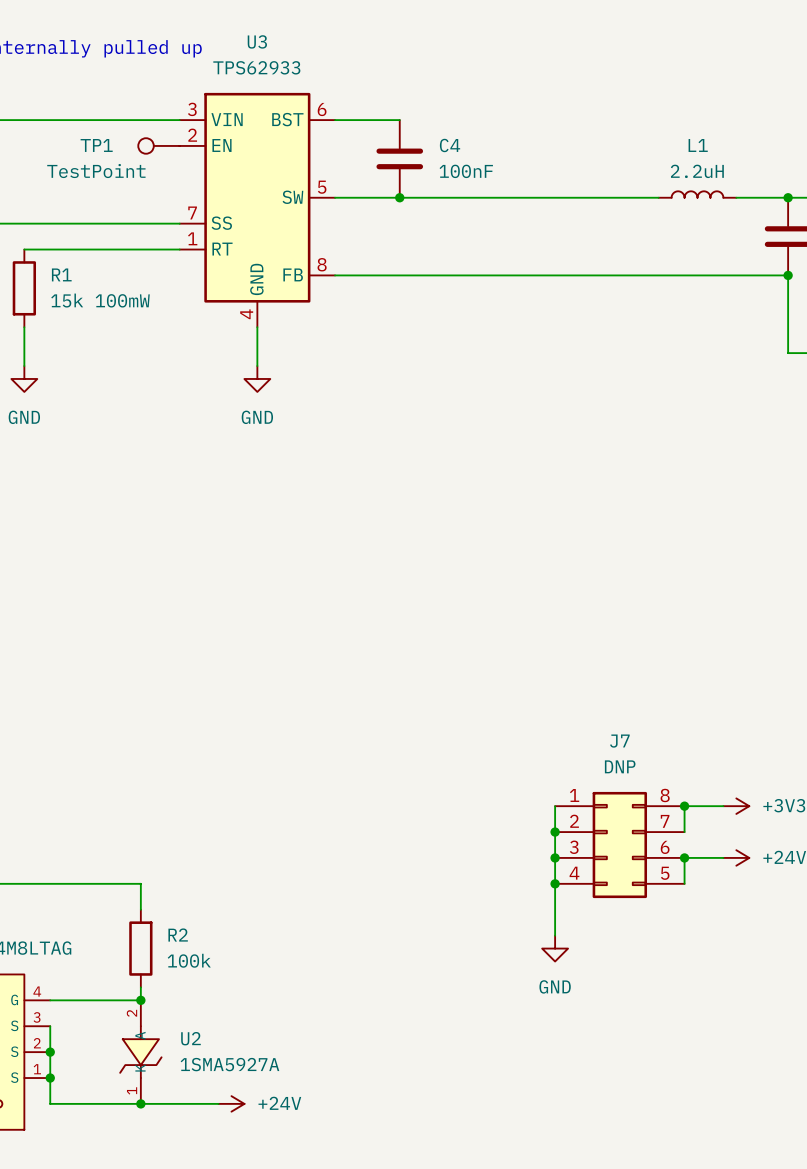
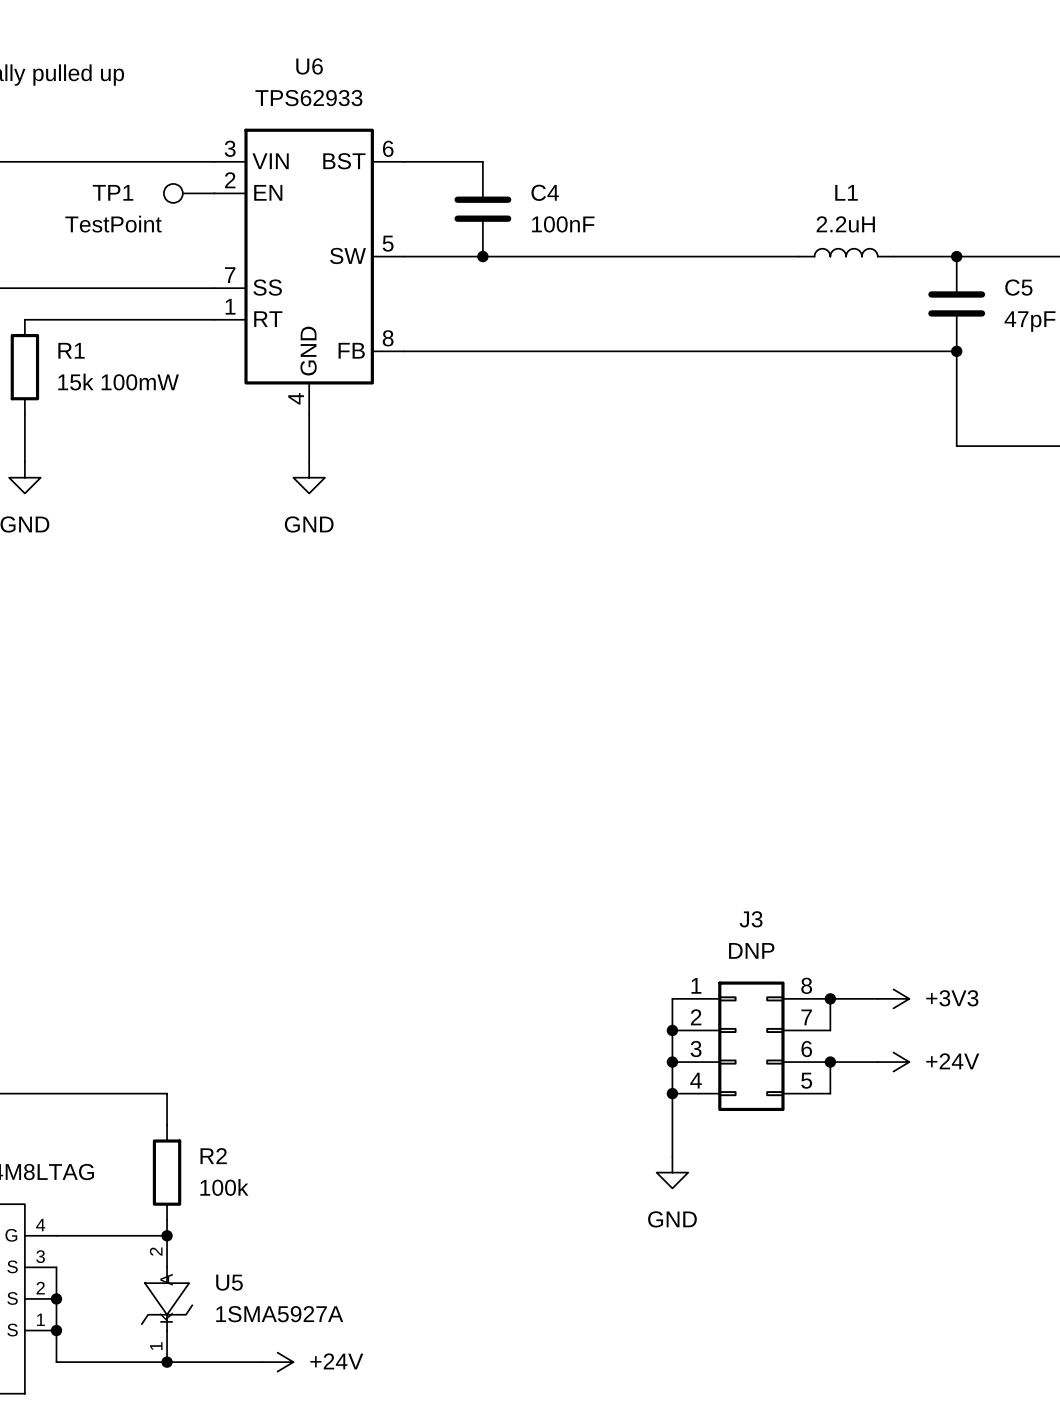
U3 name: U3 (257, 41) -> U6 (309, 66)
J7 name: J7 (619, 741) -> J3 (751, 919)
U2 name: U2 (190, 1038) -> U5 (229, 1282)

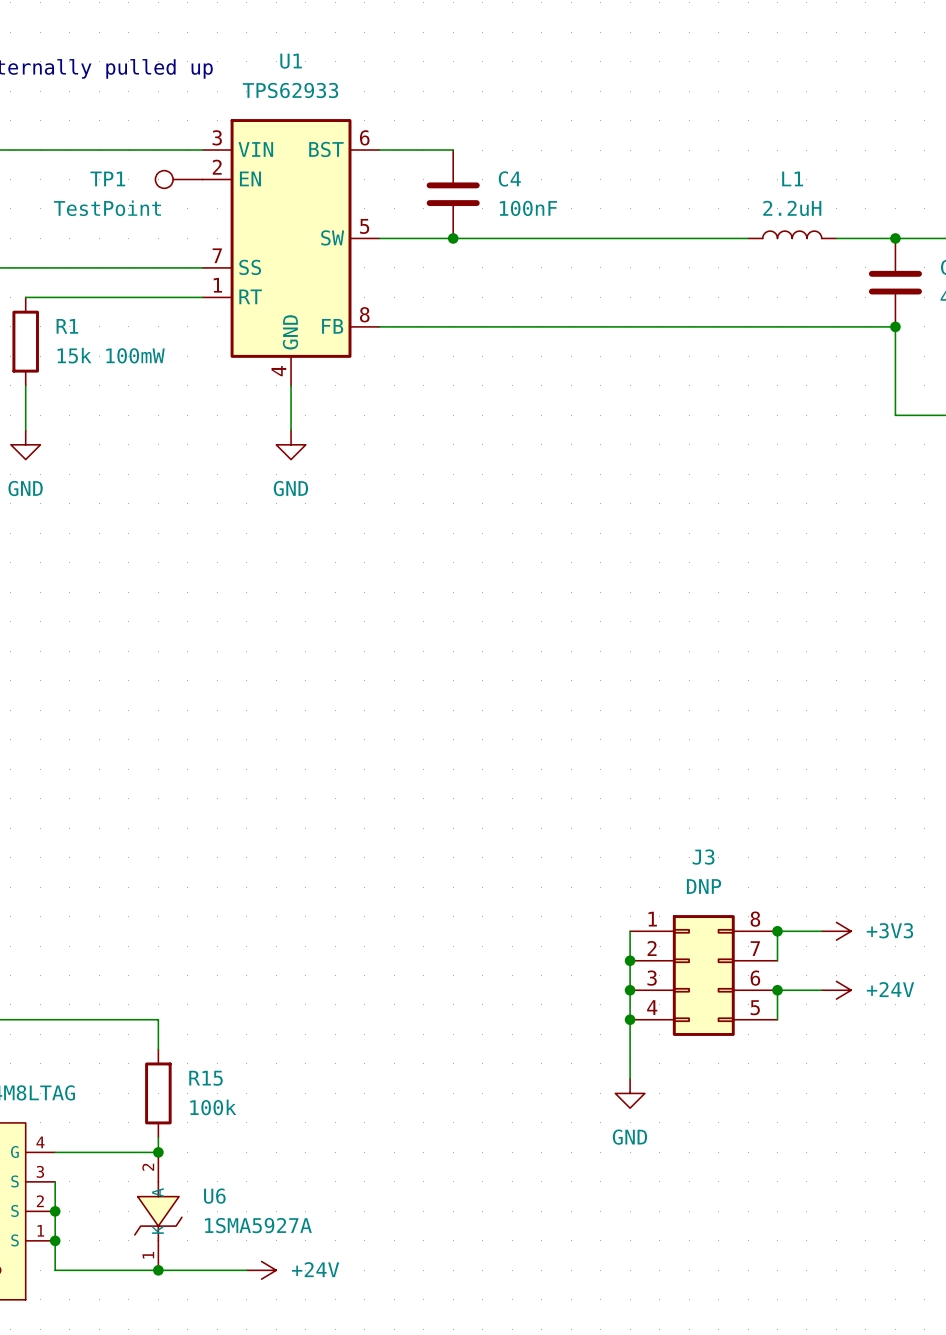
U6 name: U6 (309, 66) -> U1 (291, 61)
R2 name: R2 (213, 1156) -> R15 (206, 1078)
U5 name: U5 (229, 1282) -> U6 (214, 1196)

